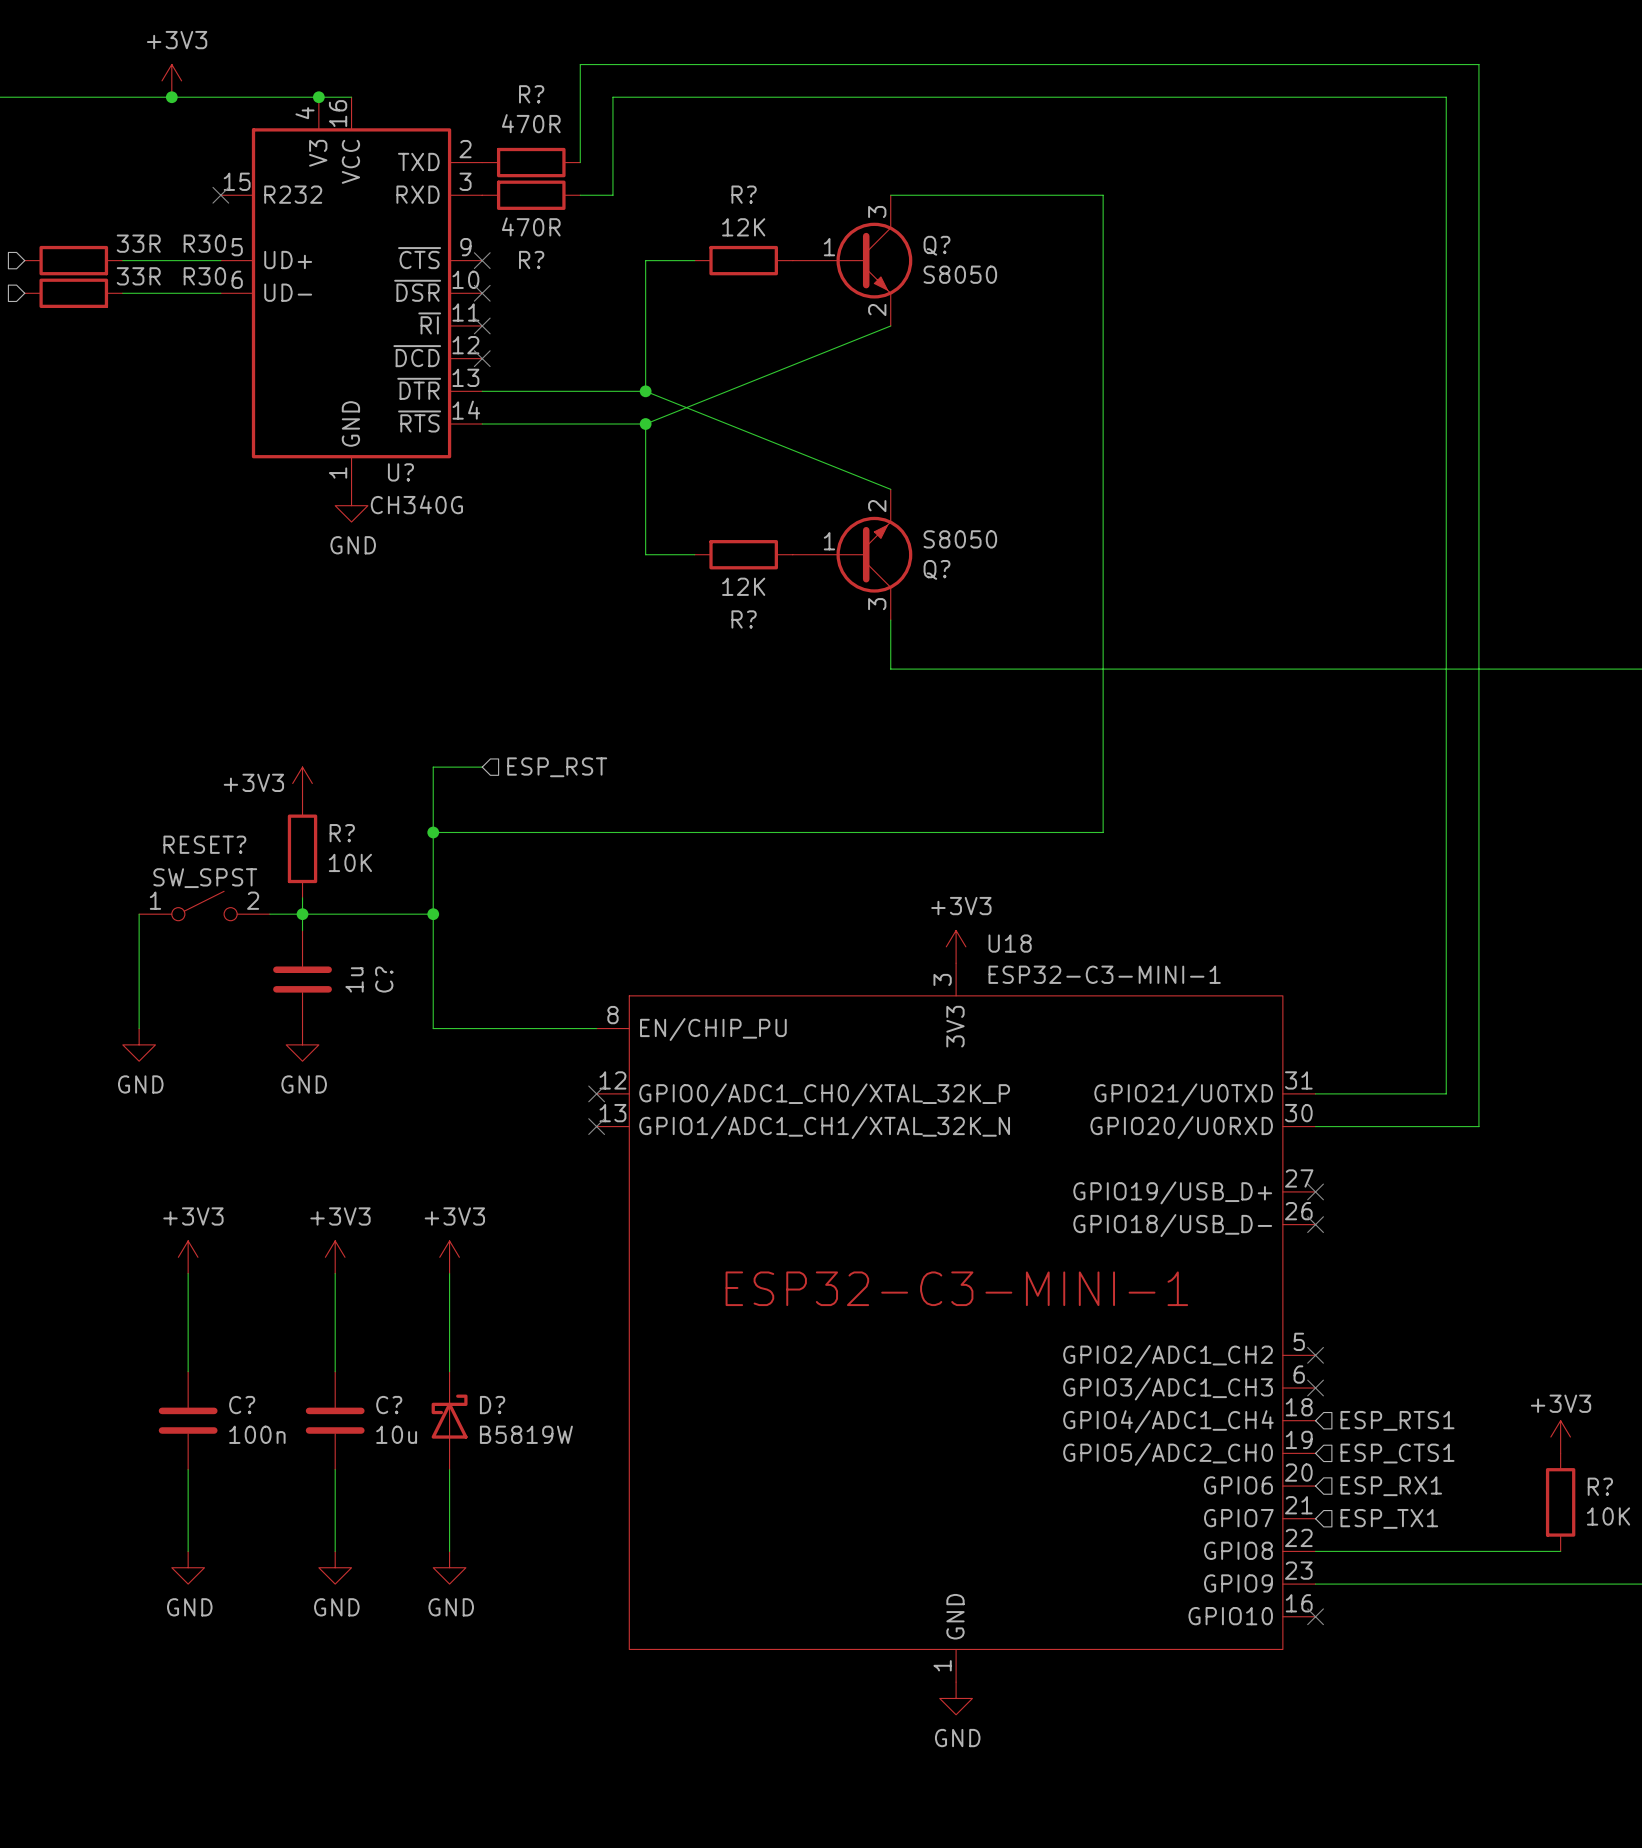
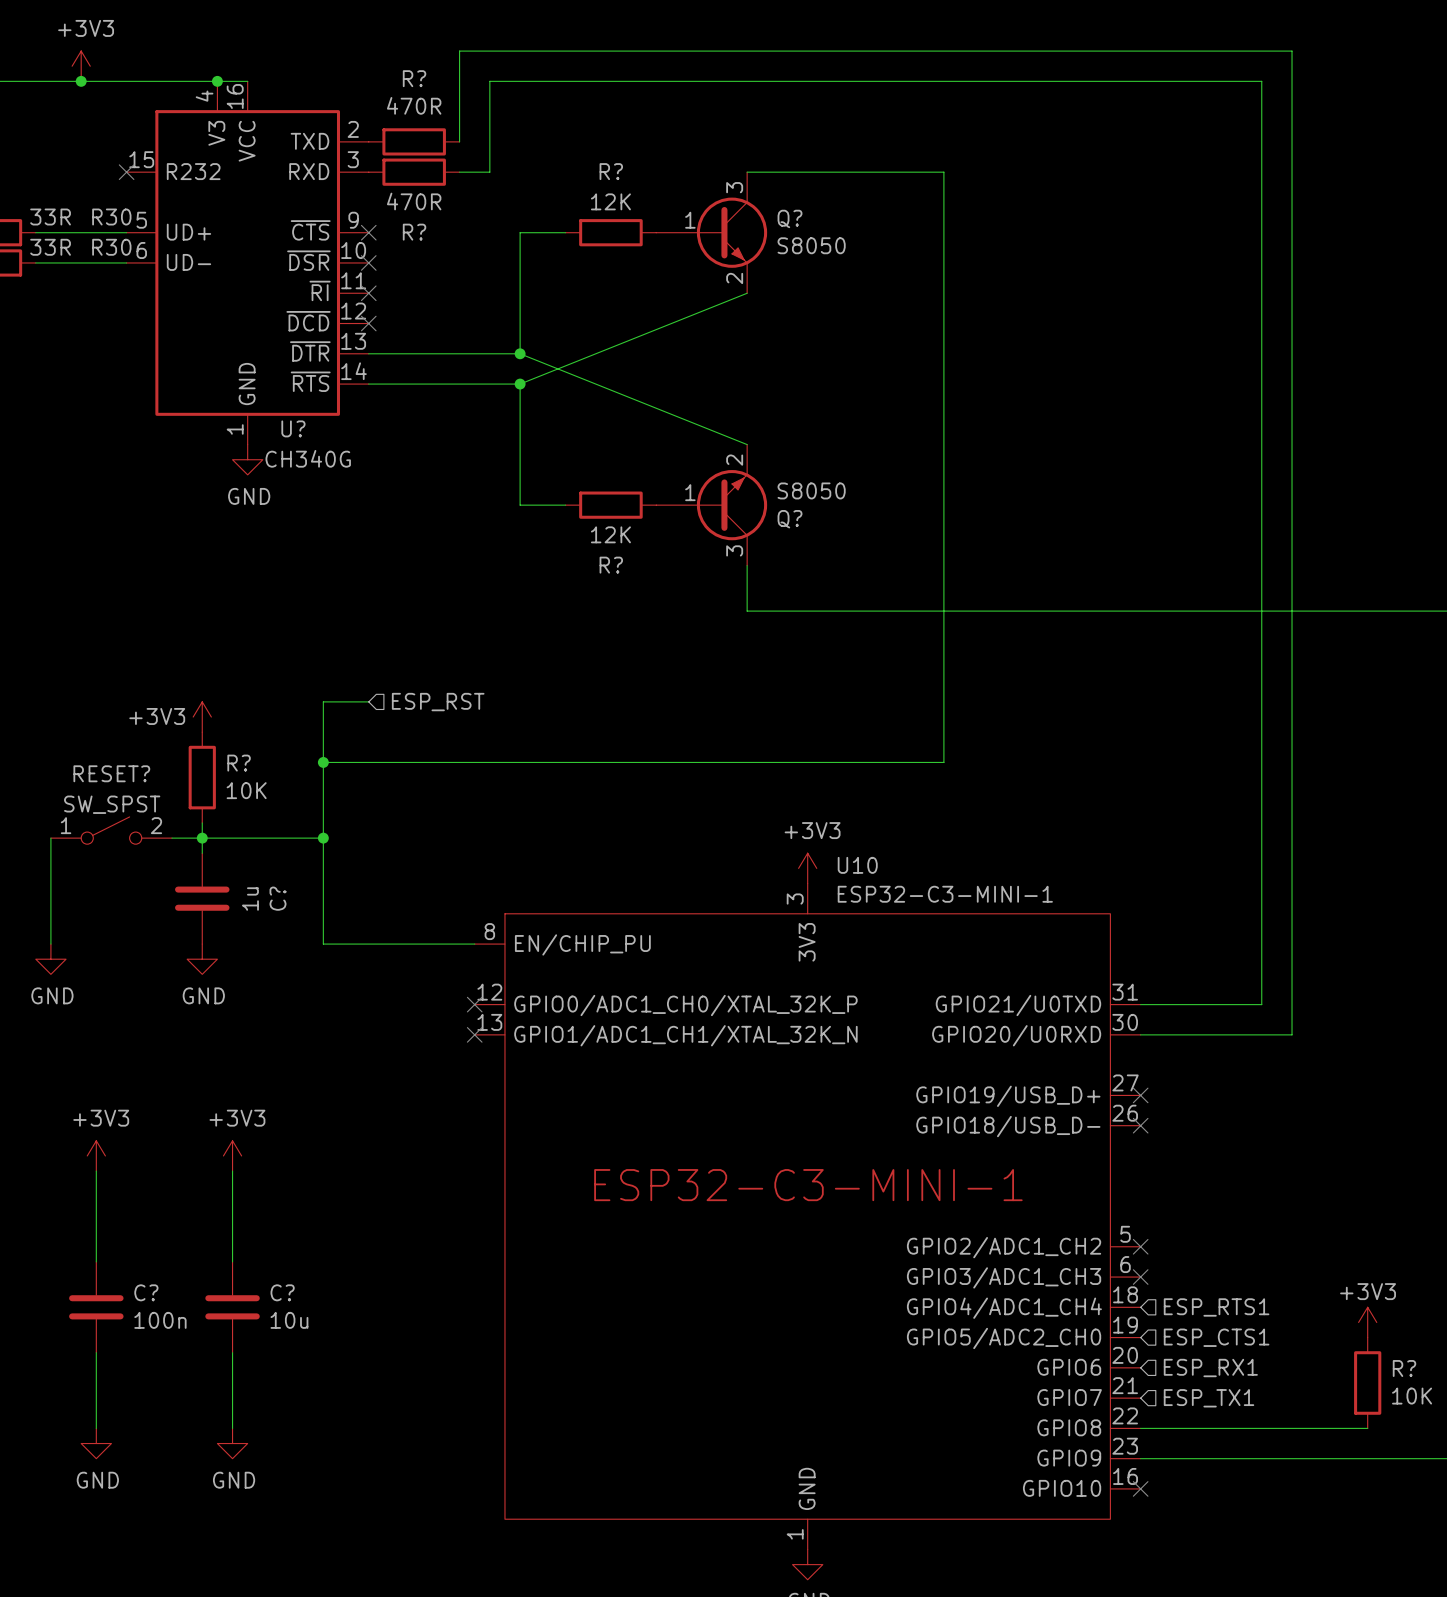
U18 name: U18 (1010, 943) -> U10 (857, 865)
power symbol: +3V3 (449, 1257) -> none
wire: (449, 1273) (449, 1371) -> none
D?: B5819W (449, 1420) -> none
wire: (449, 1469) (449, 1551) -> none
power symbol: GND (449, 1567) -> none

